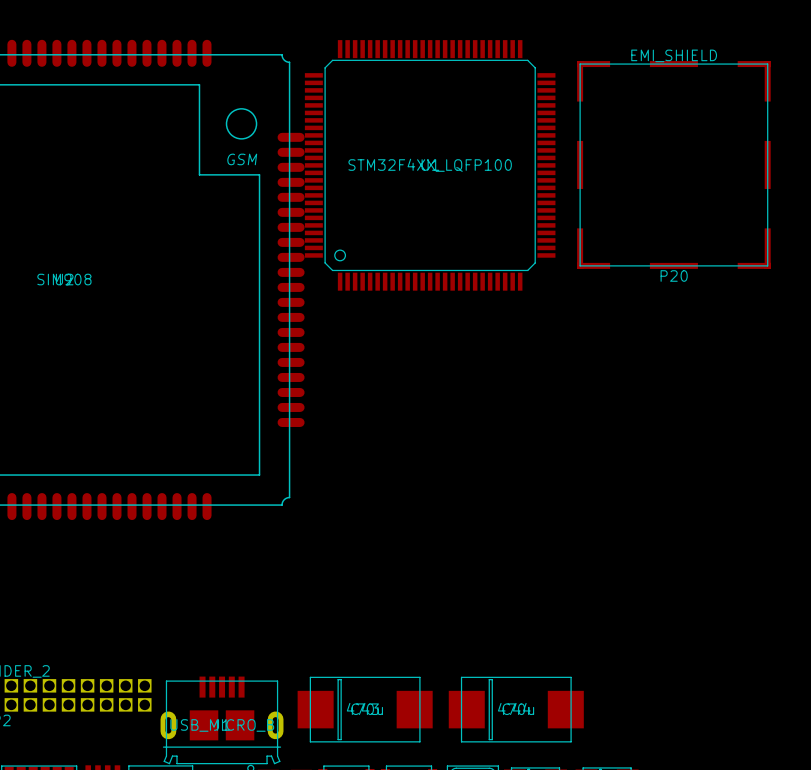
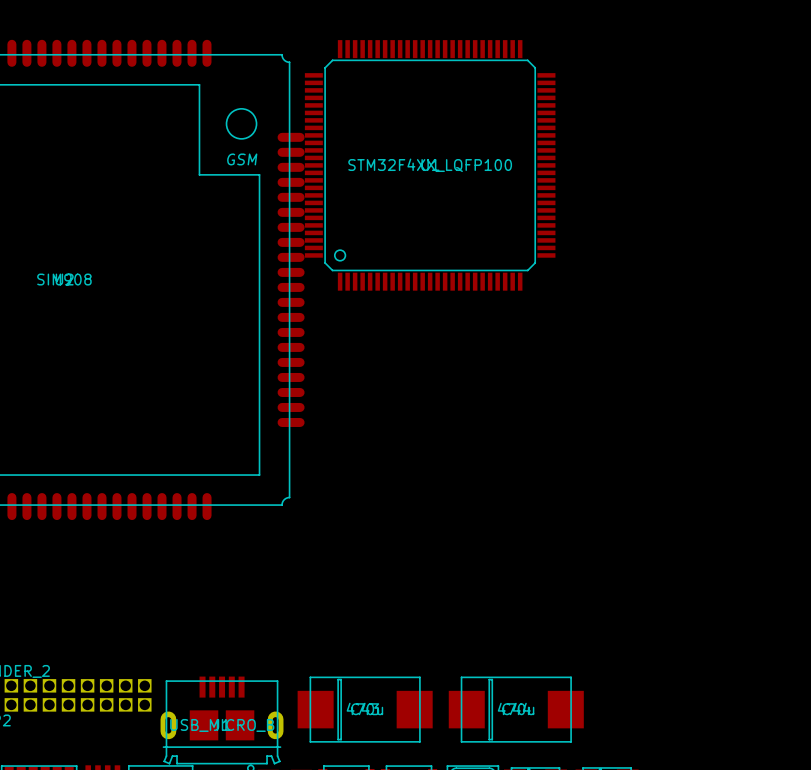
P20: EMI_SHIELD (673, 164) -> none

